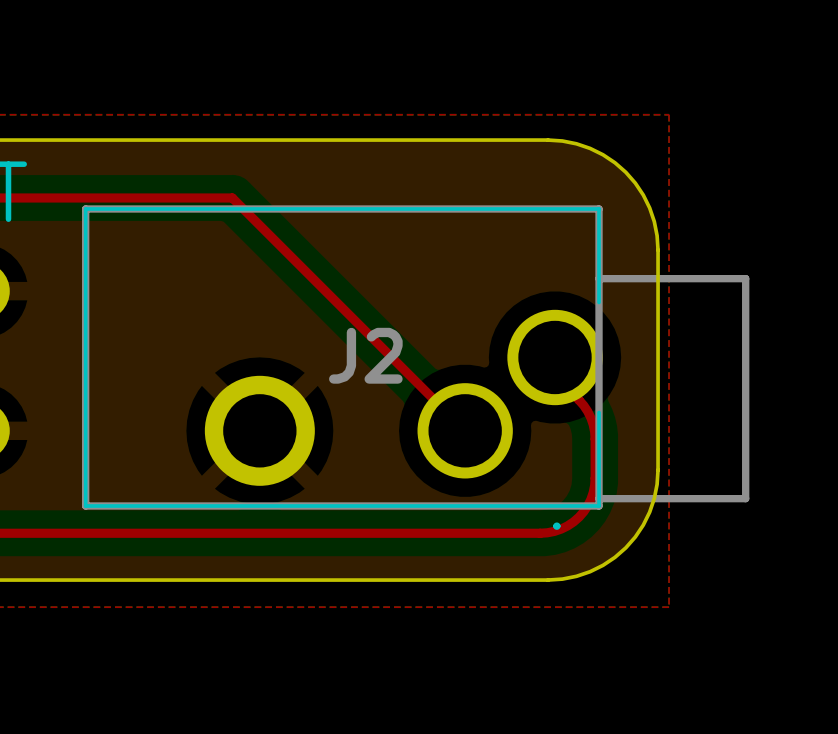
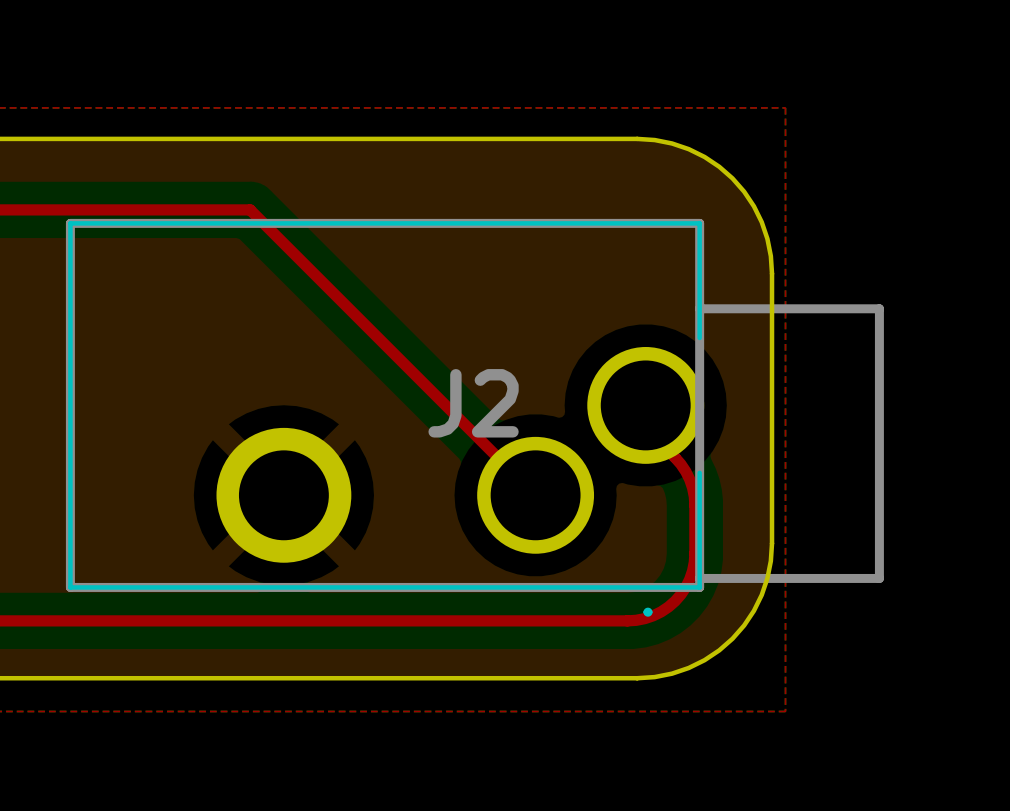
J2 name position: J2 (365, 355) -> J2 (473, 403)

